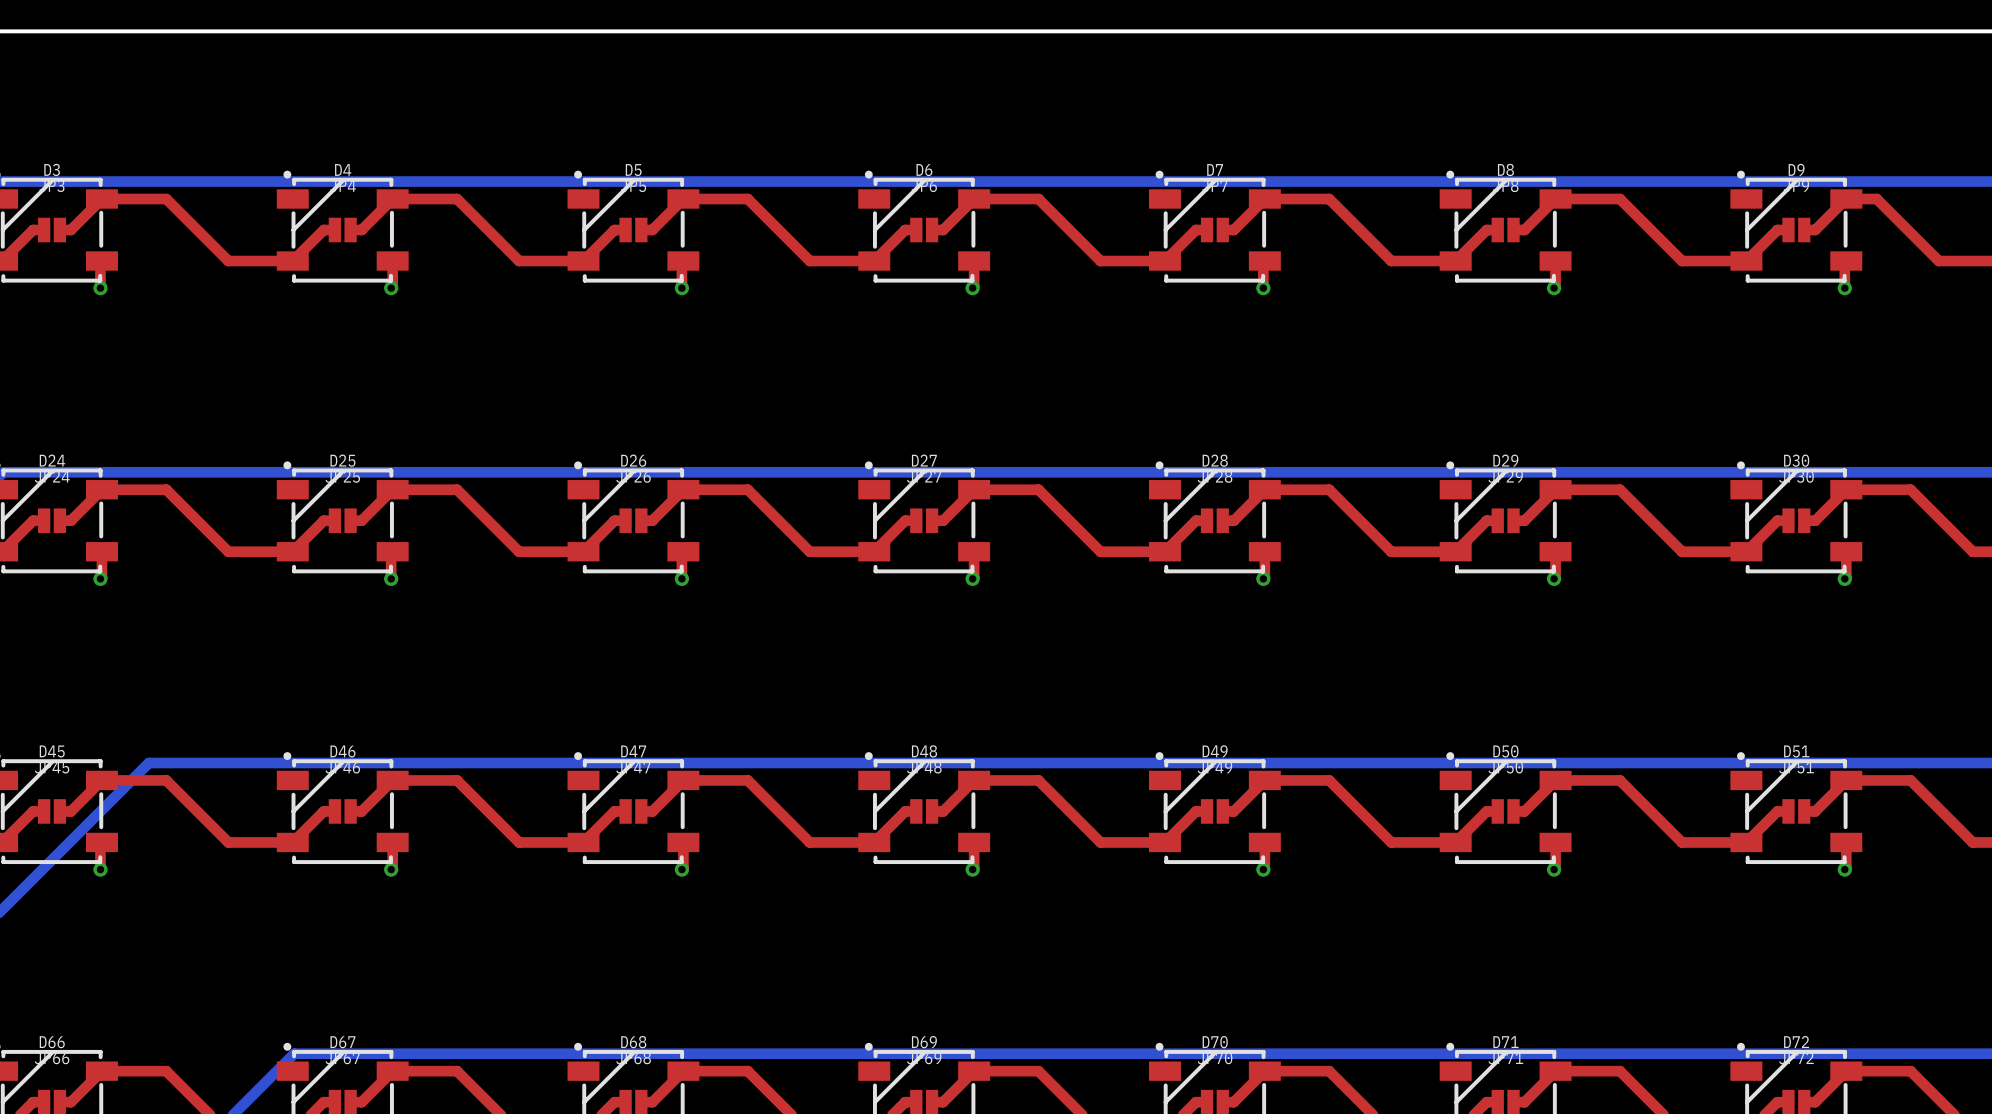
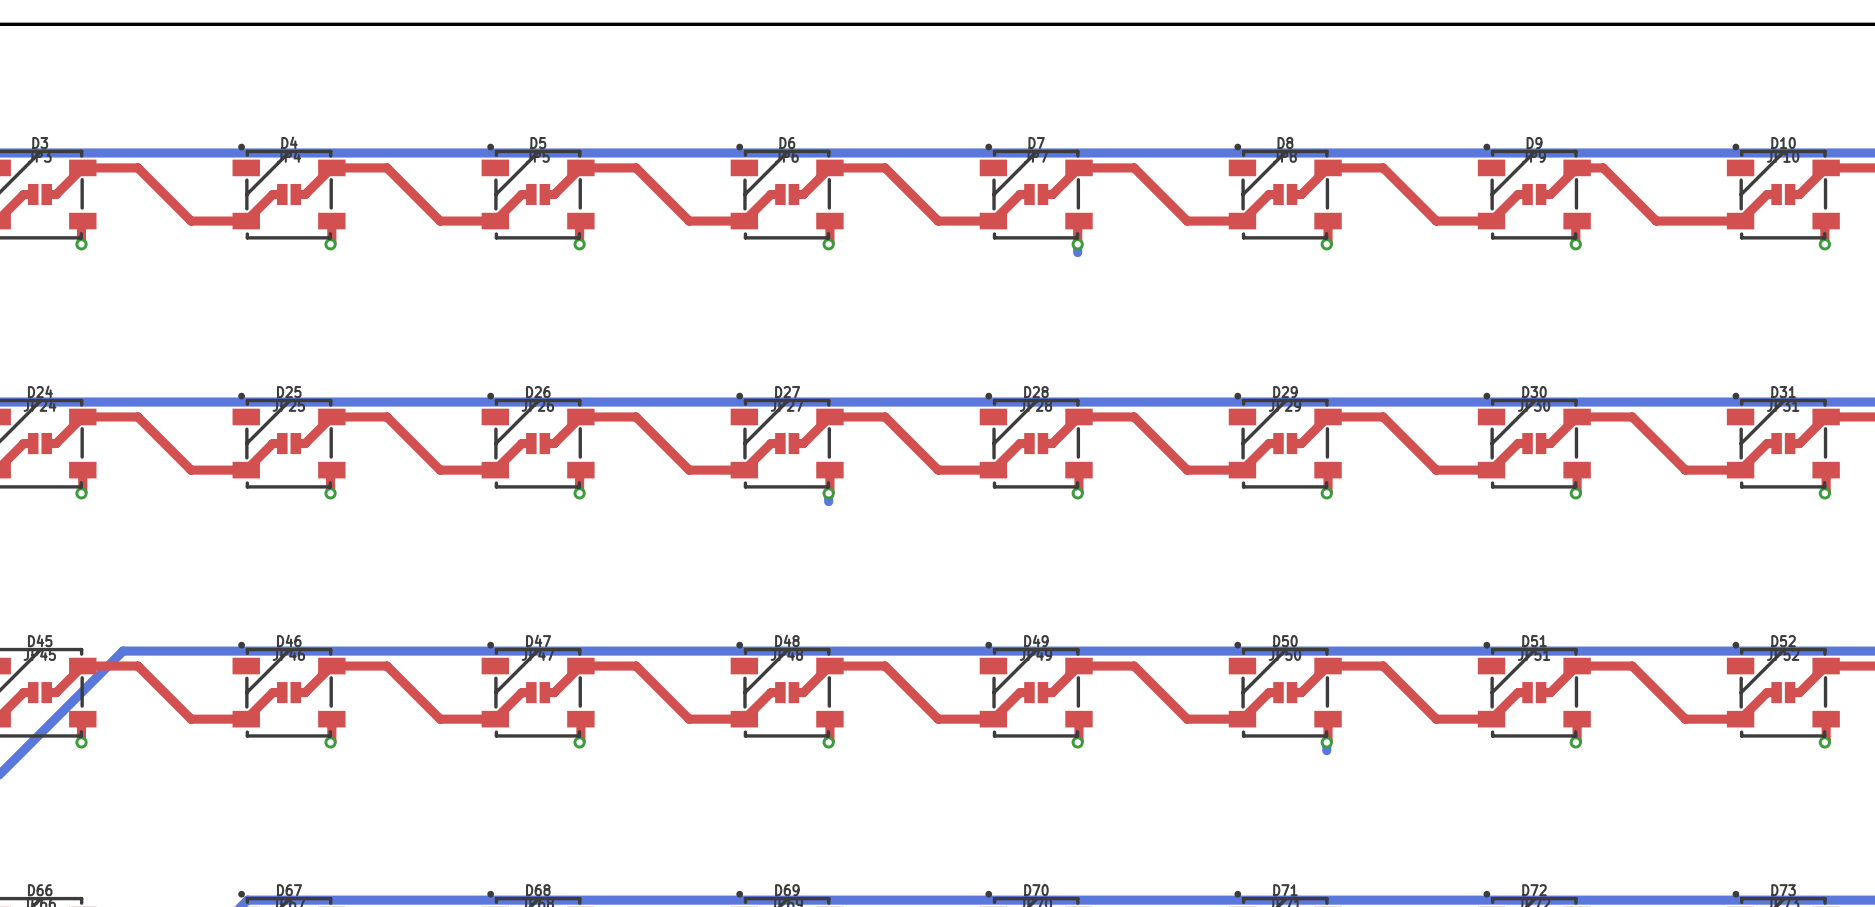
bottom track: none -> (1077, 244) (1077, 252)
bottom track: none -> (828, 493) (828, 501)
bottom track: none -> (1326, 742) (1326, 750)

